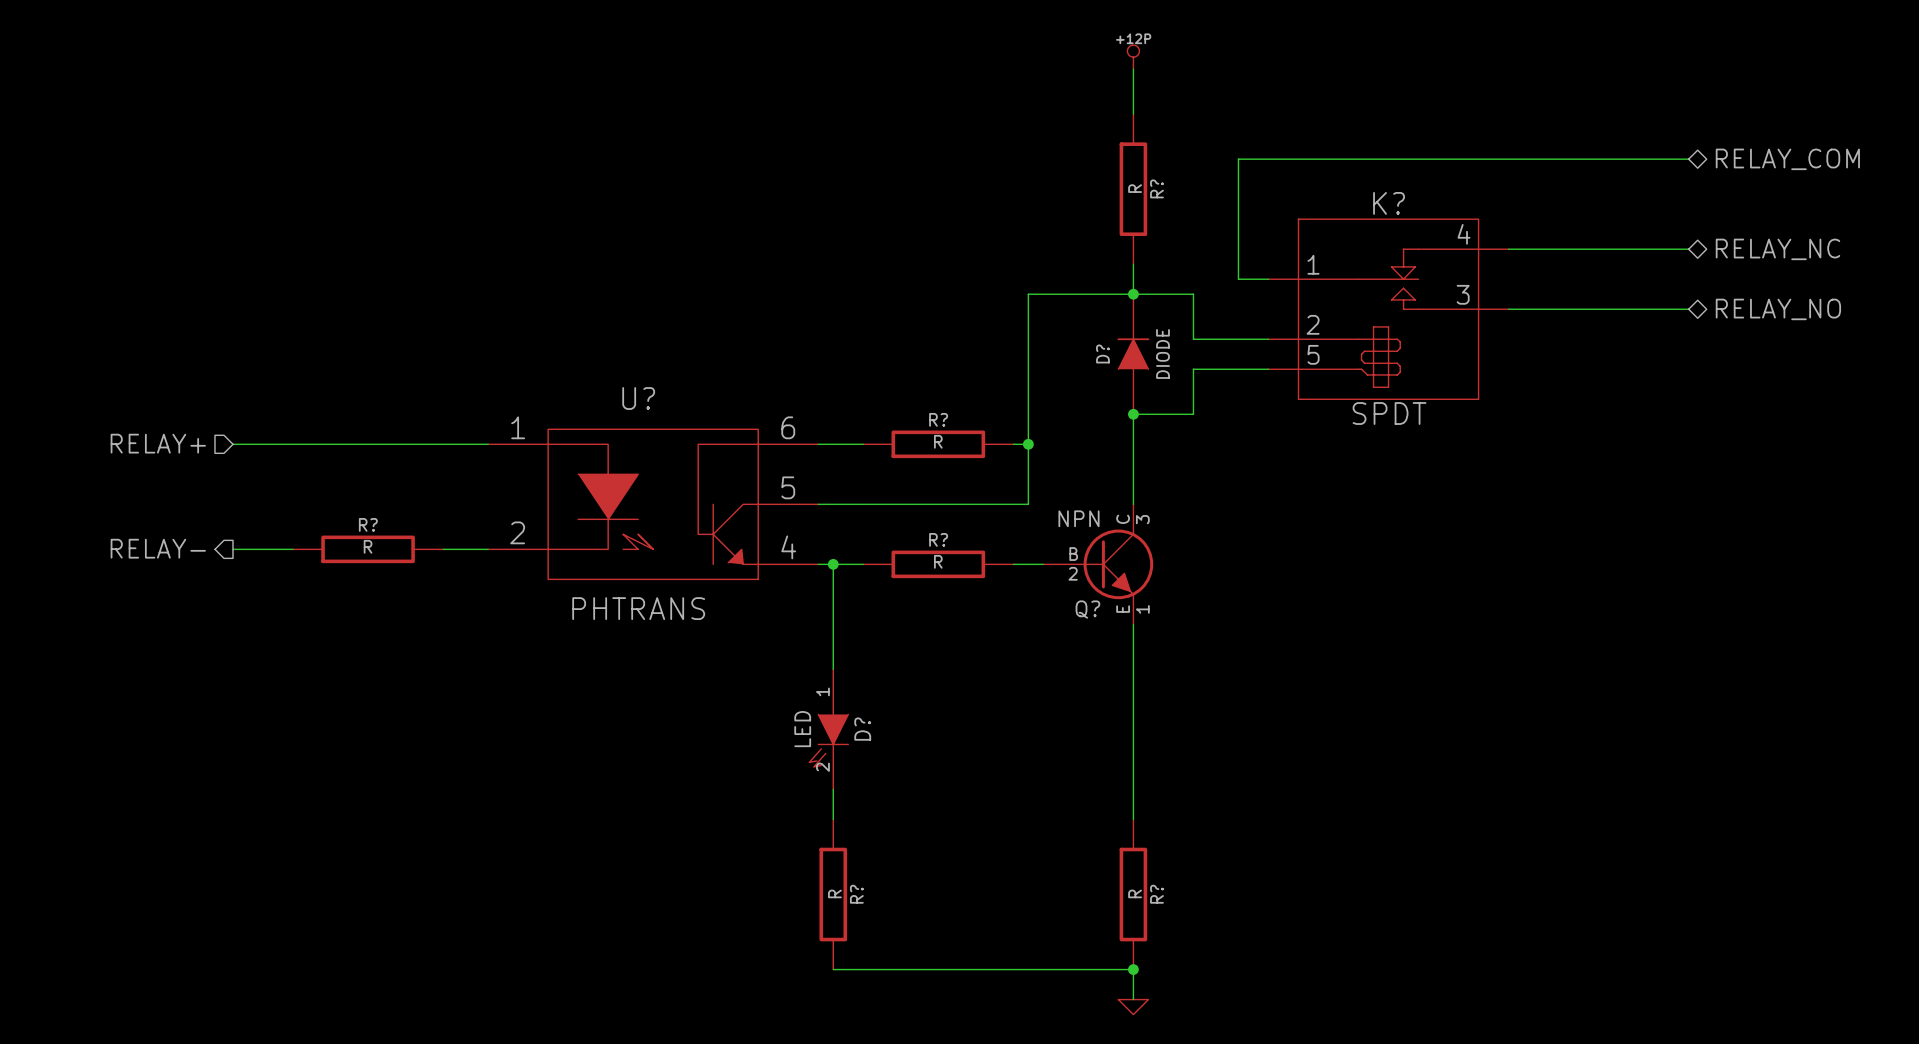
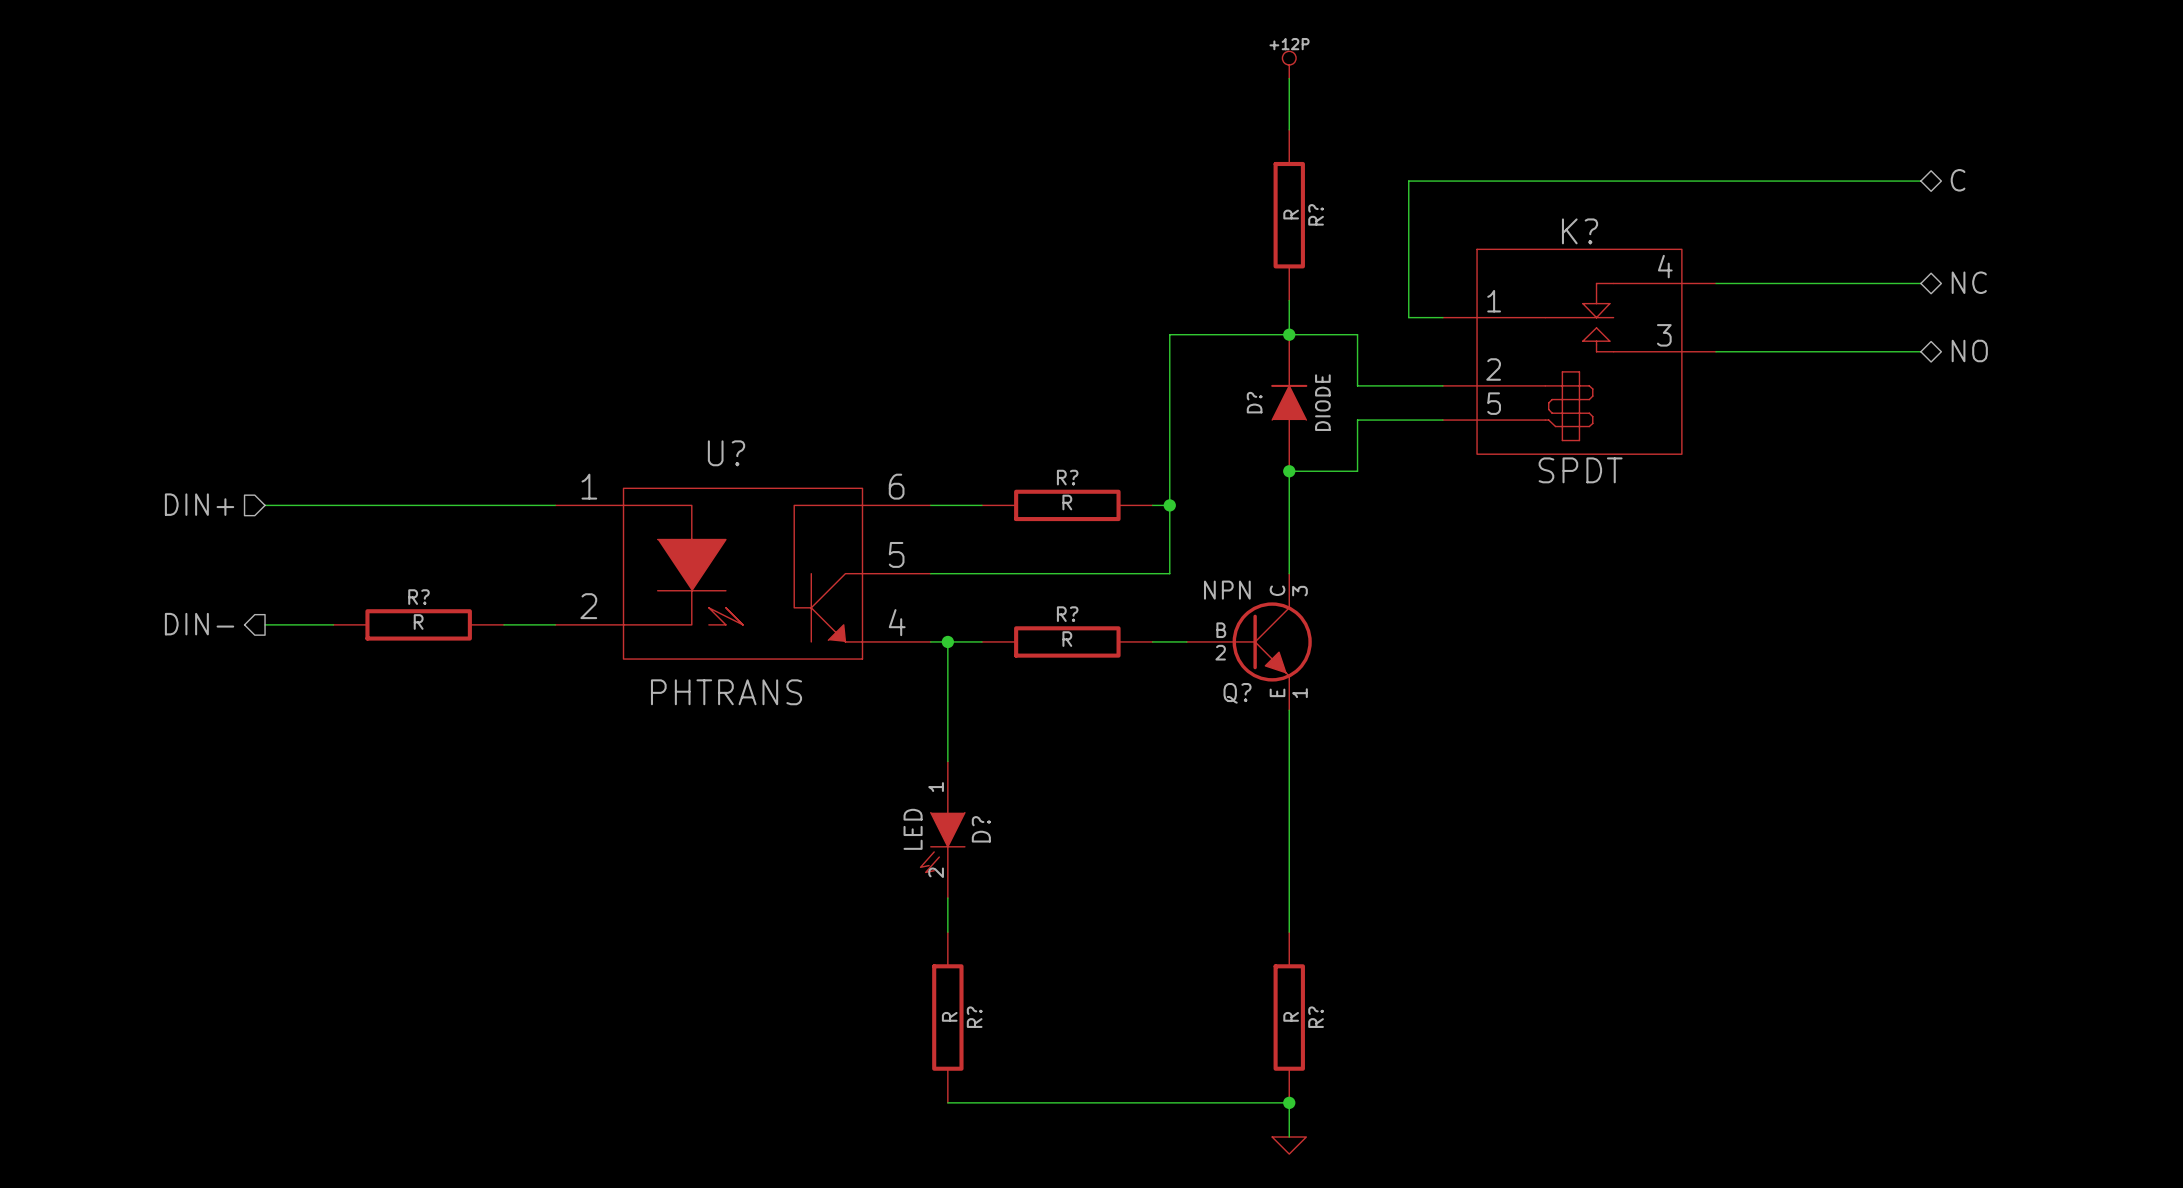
hierarchical label: RELAY_COM (1787, 159) -> C (1958, 180)
hierarchical label: RELAY_NC (1777, 249) -> NC (1969, 282)
hierarchical label: RELAY_NO (1778, 309) -> NO (1969, 351)
hierarchical label: RELAY+ (158, 443) -> DIN+ (199, 504)
hierarchical label: RELAY- (158, 548) -> DIN- (199, 624)

